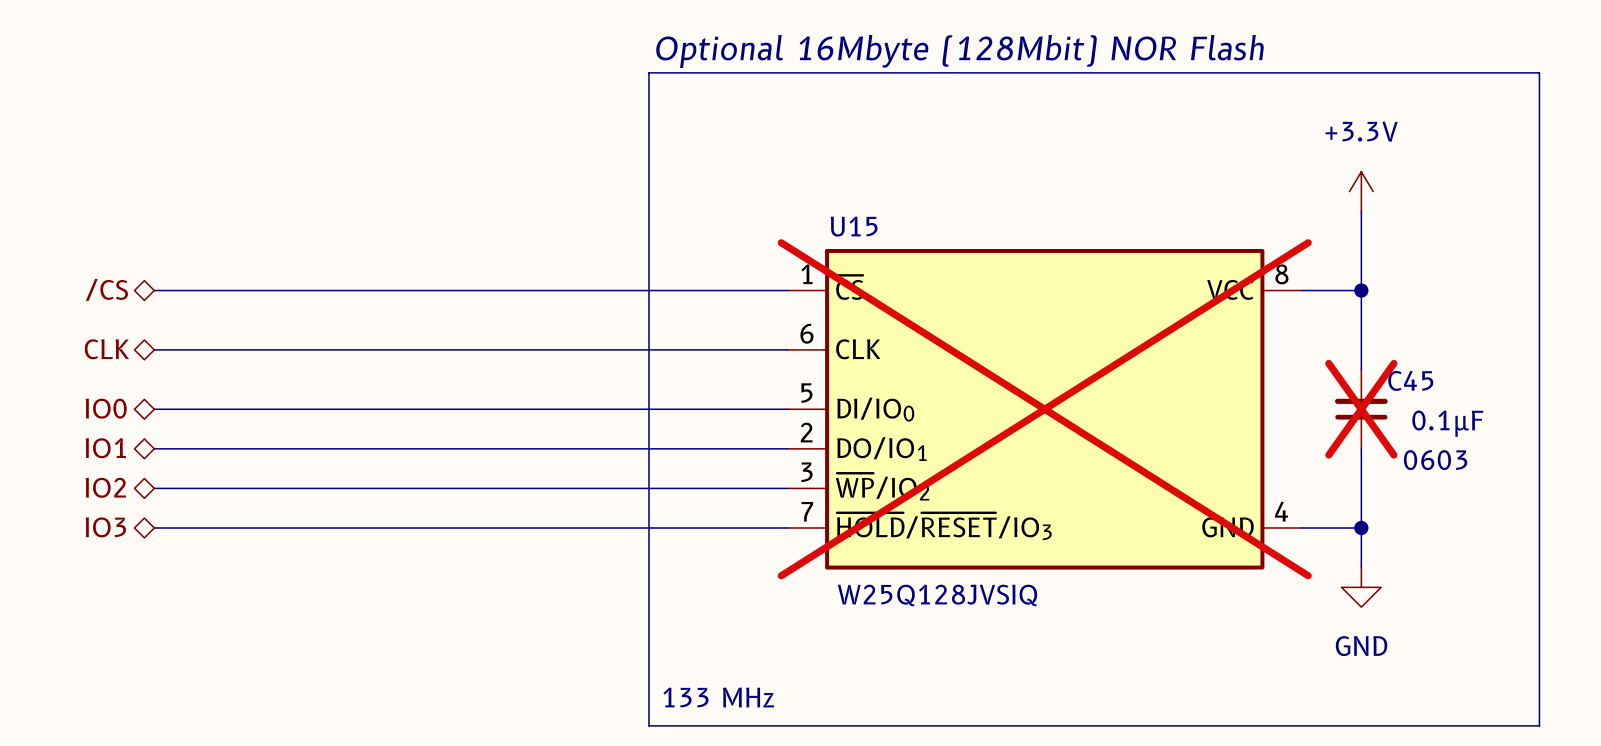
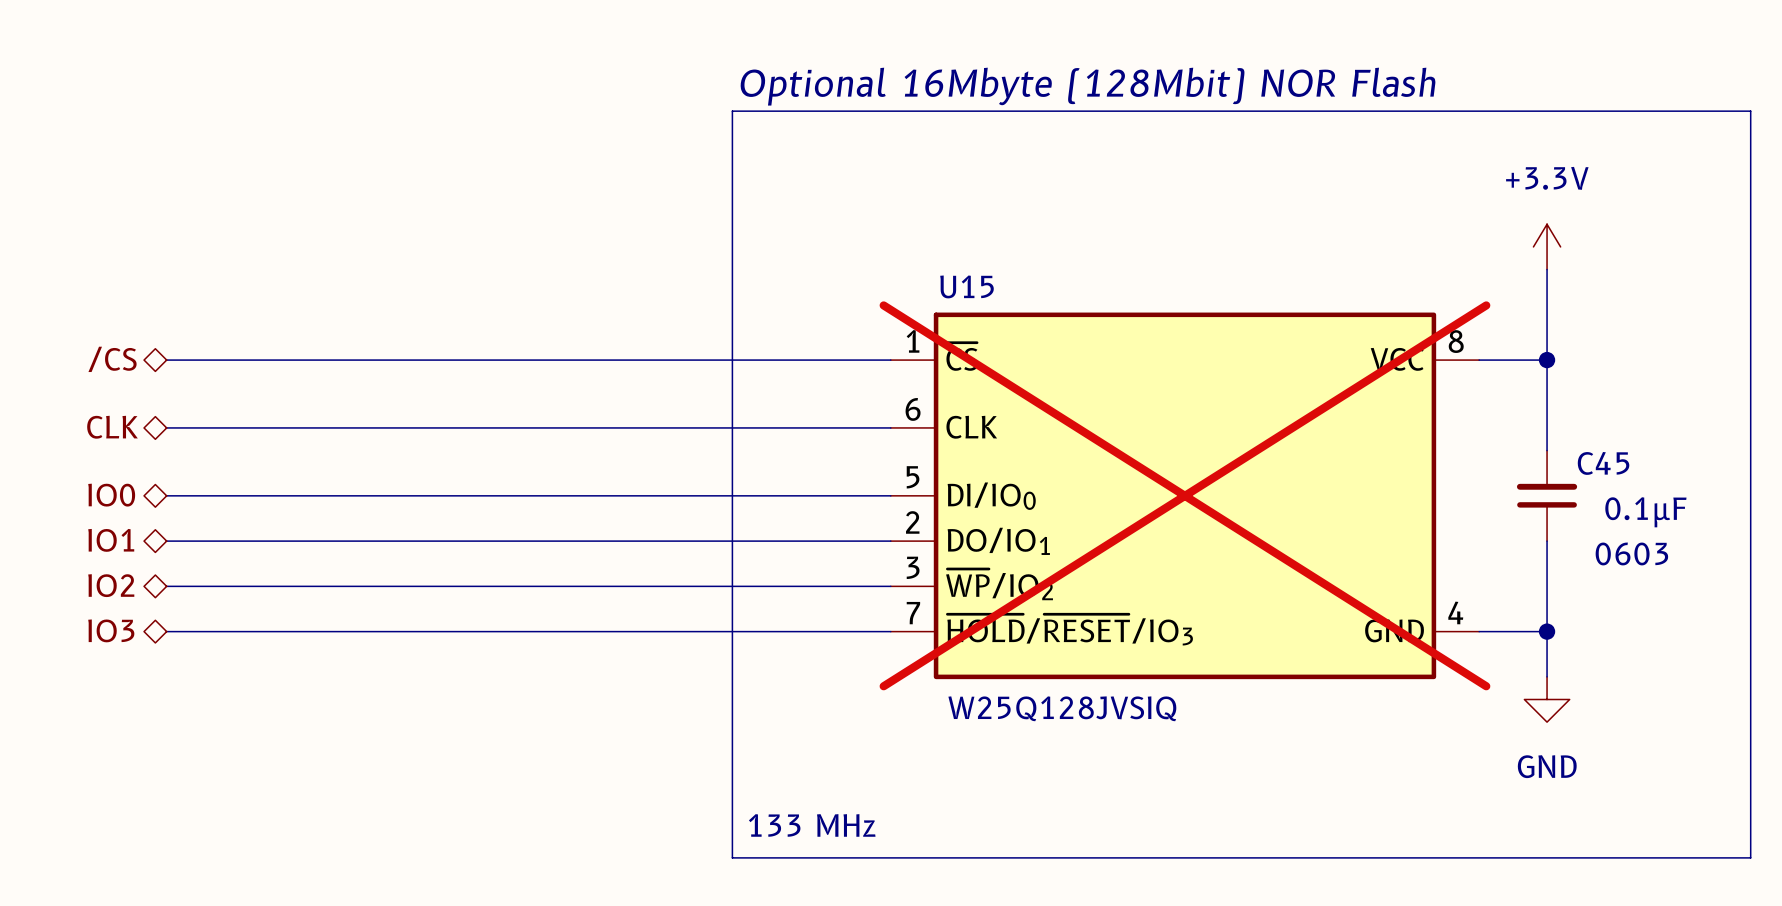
C45 do-not-place cross: (1361, 409) -> none

